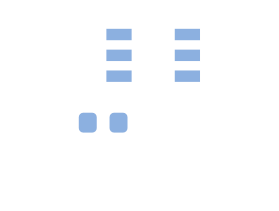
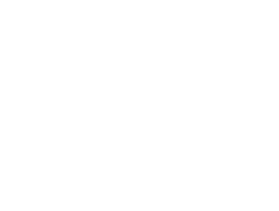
part: (153, 55) -> none
part: (103, 122) -> none

